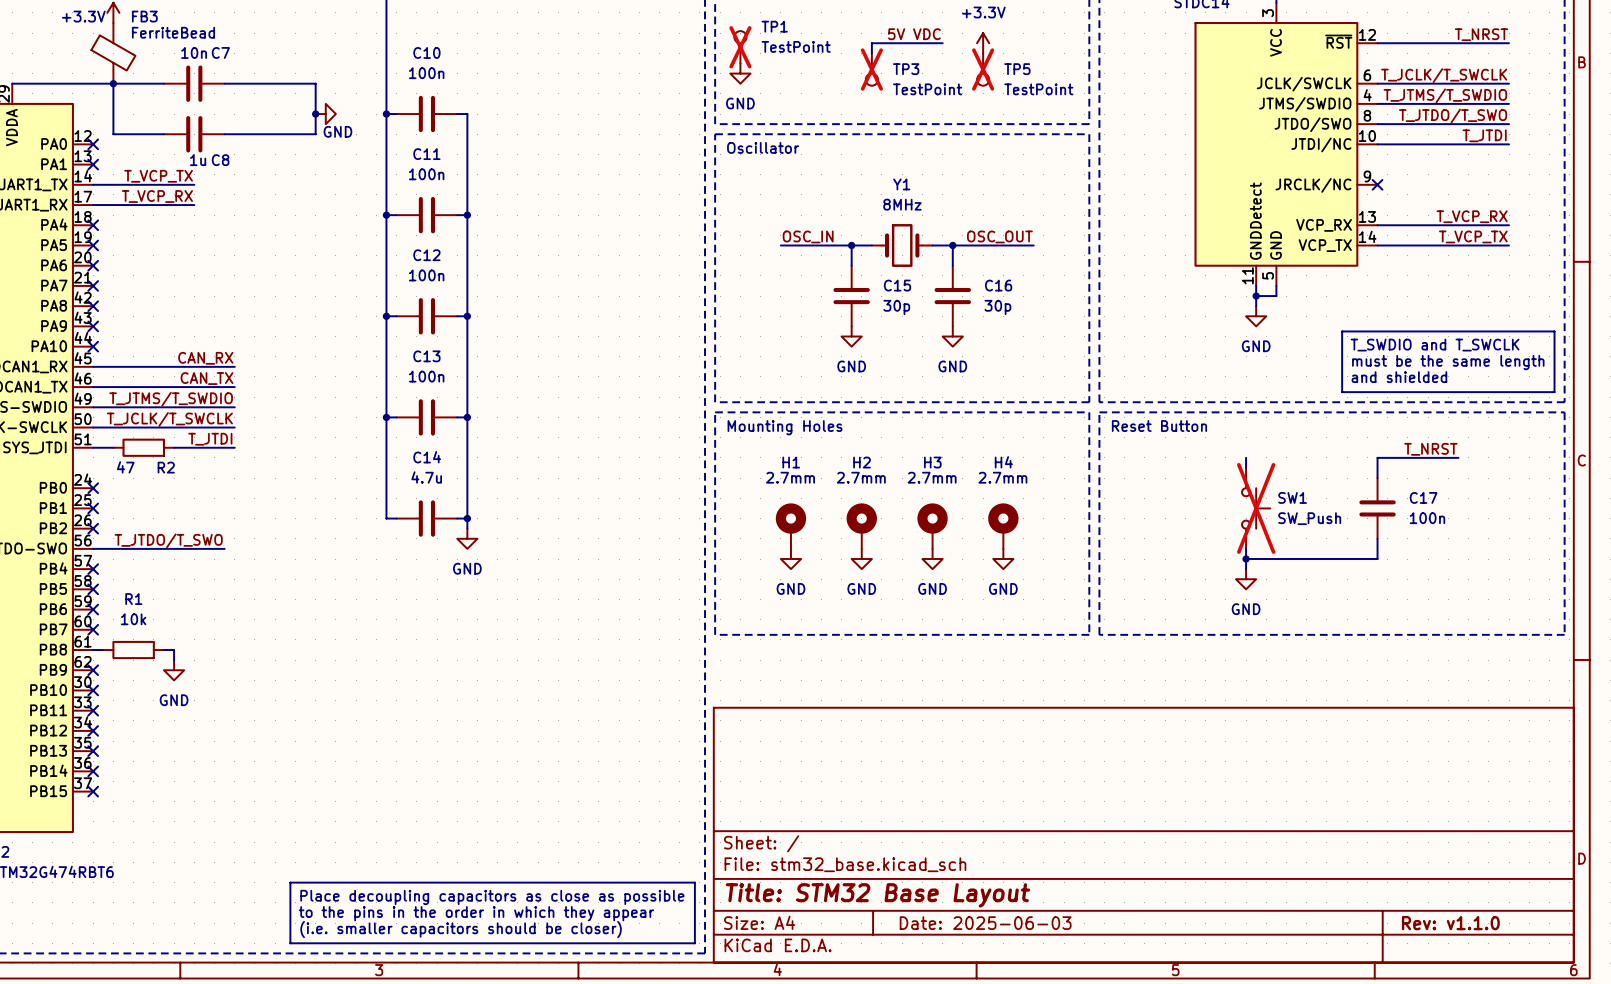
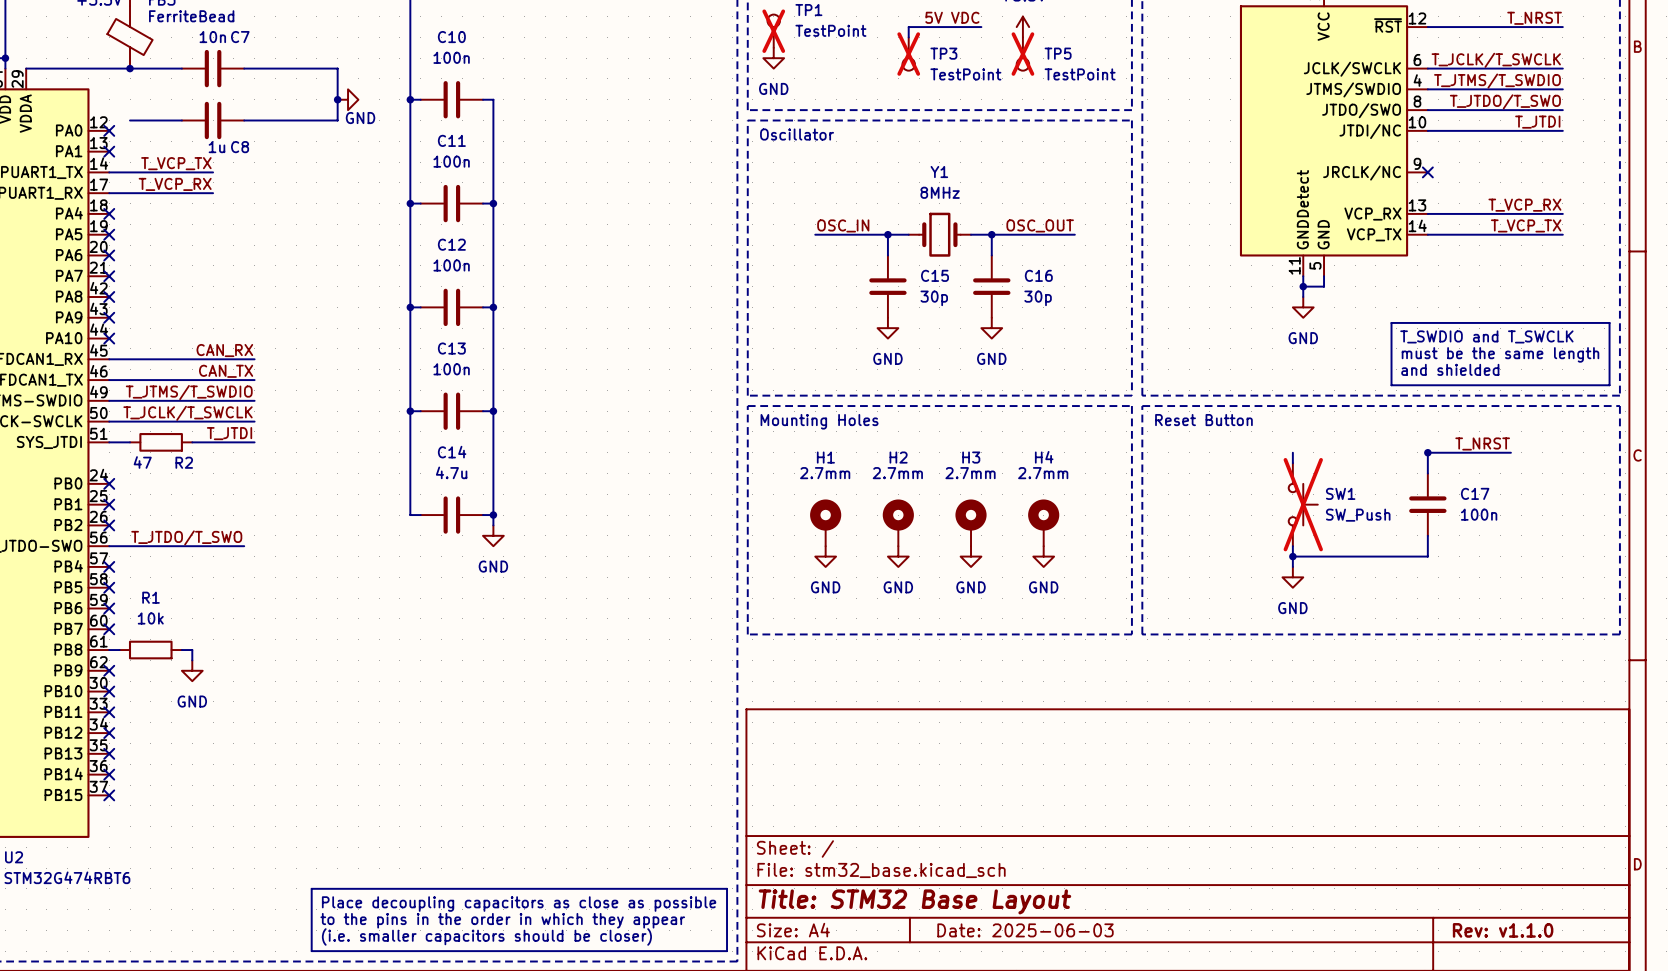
wire: (113, 83) (113, 134) -> none
junction: none -> (1427, 452)

